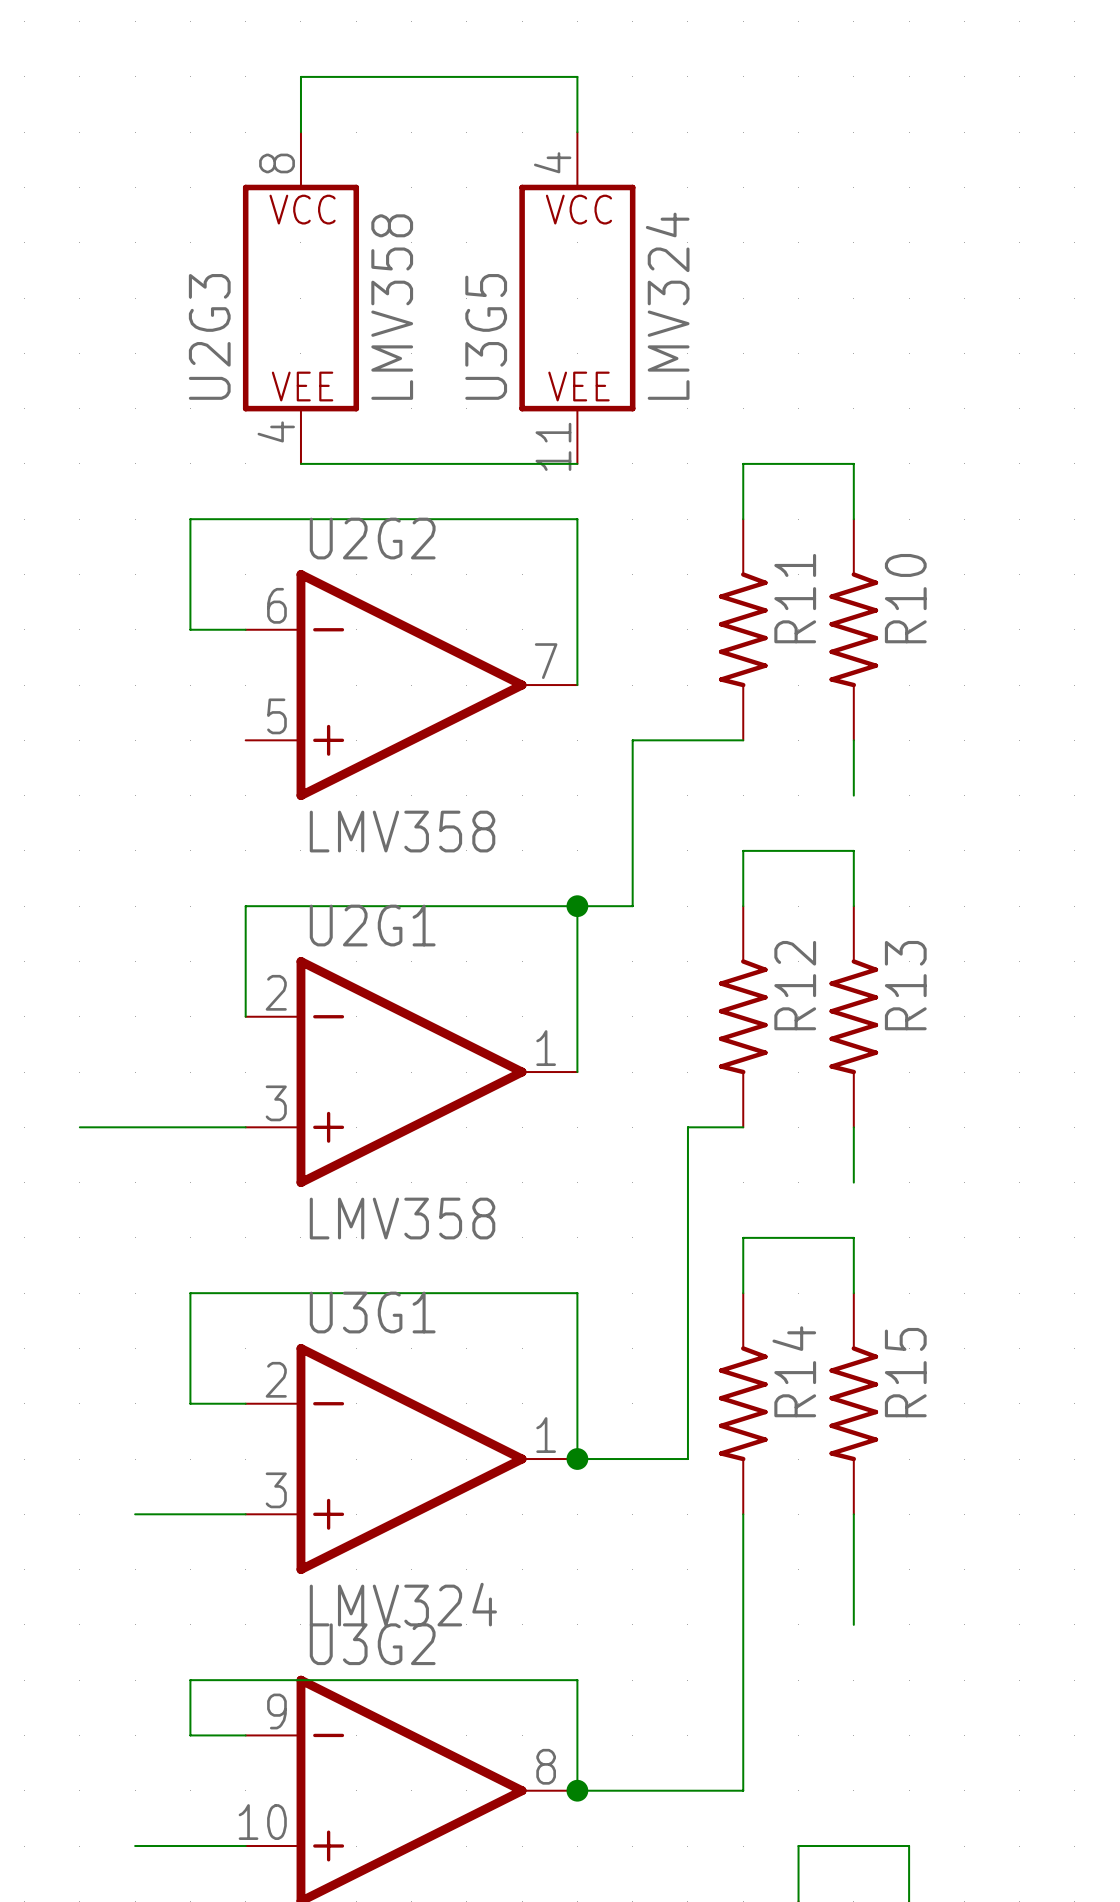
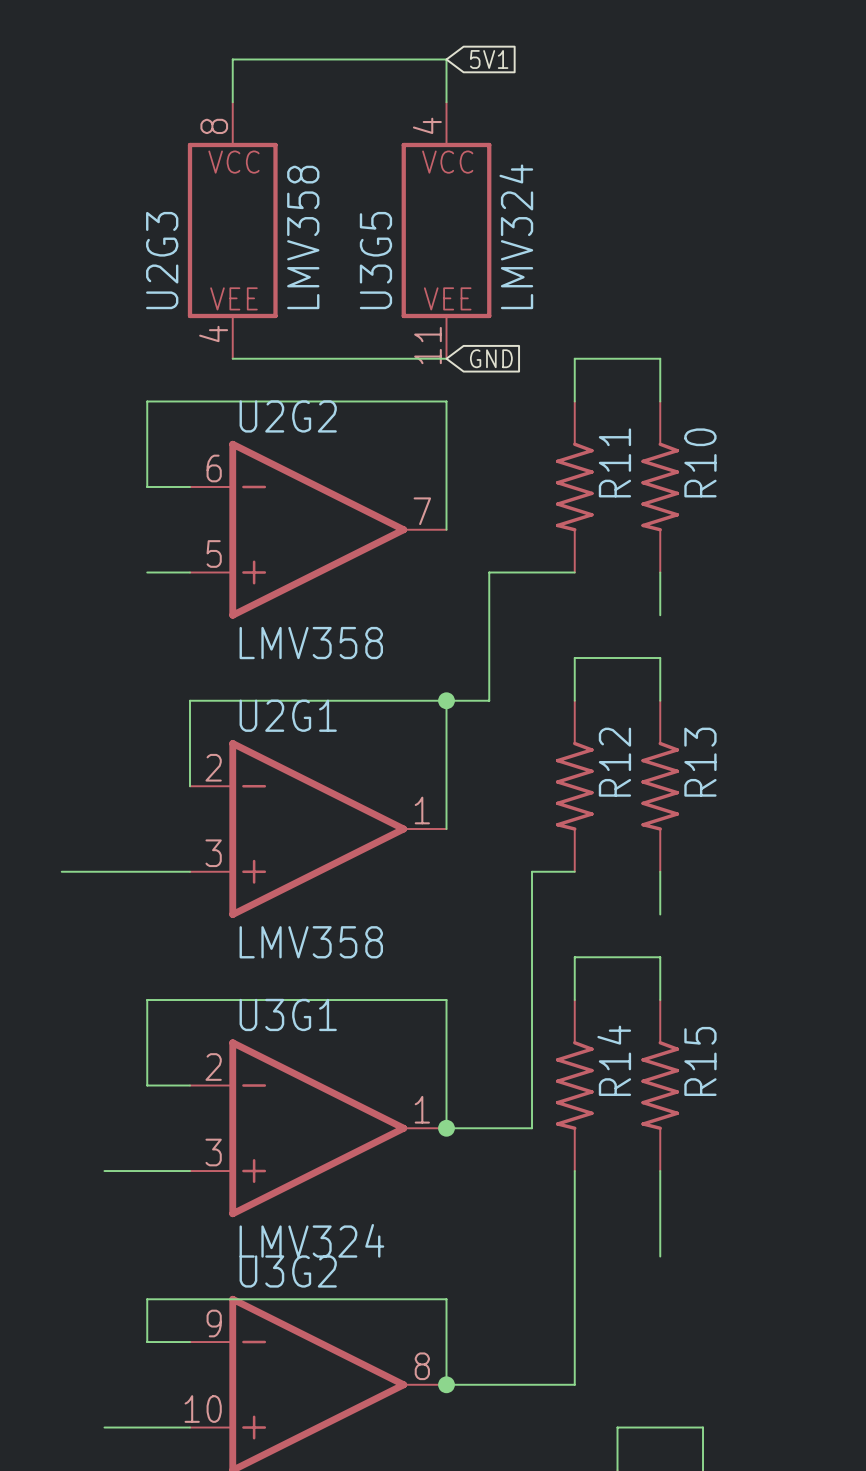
global label: none -> 5V1 (489, 59)
global label: none -> GND (491, 358)
wire: none -> (147, 572) (189, 572)

